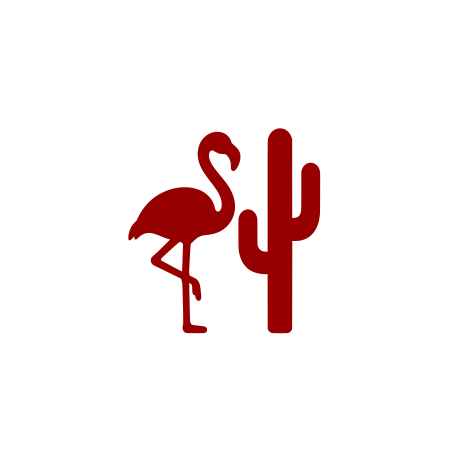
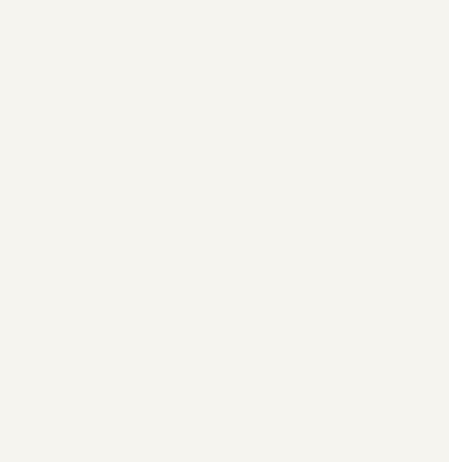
power symbol: (224, 230) -> none

